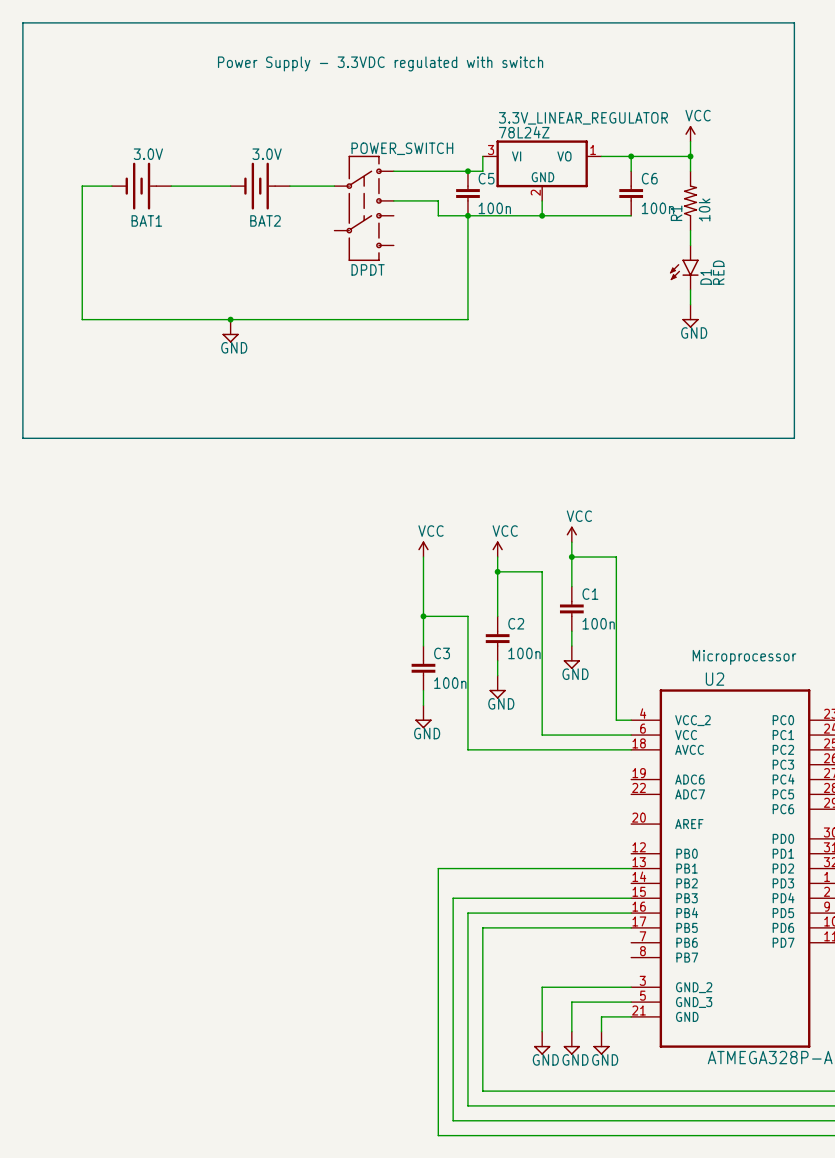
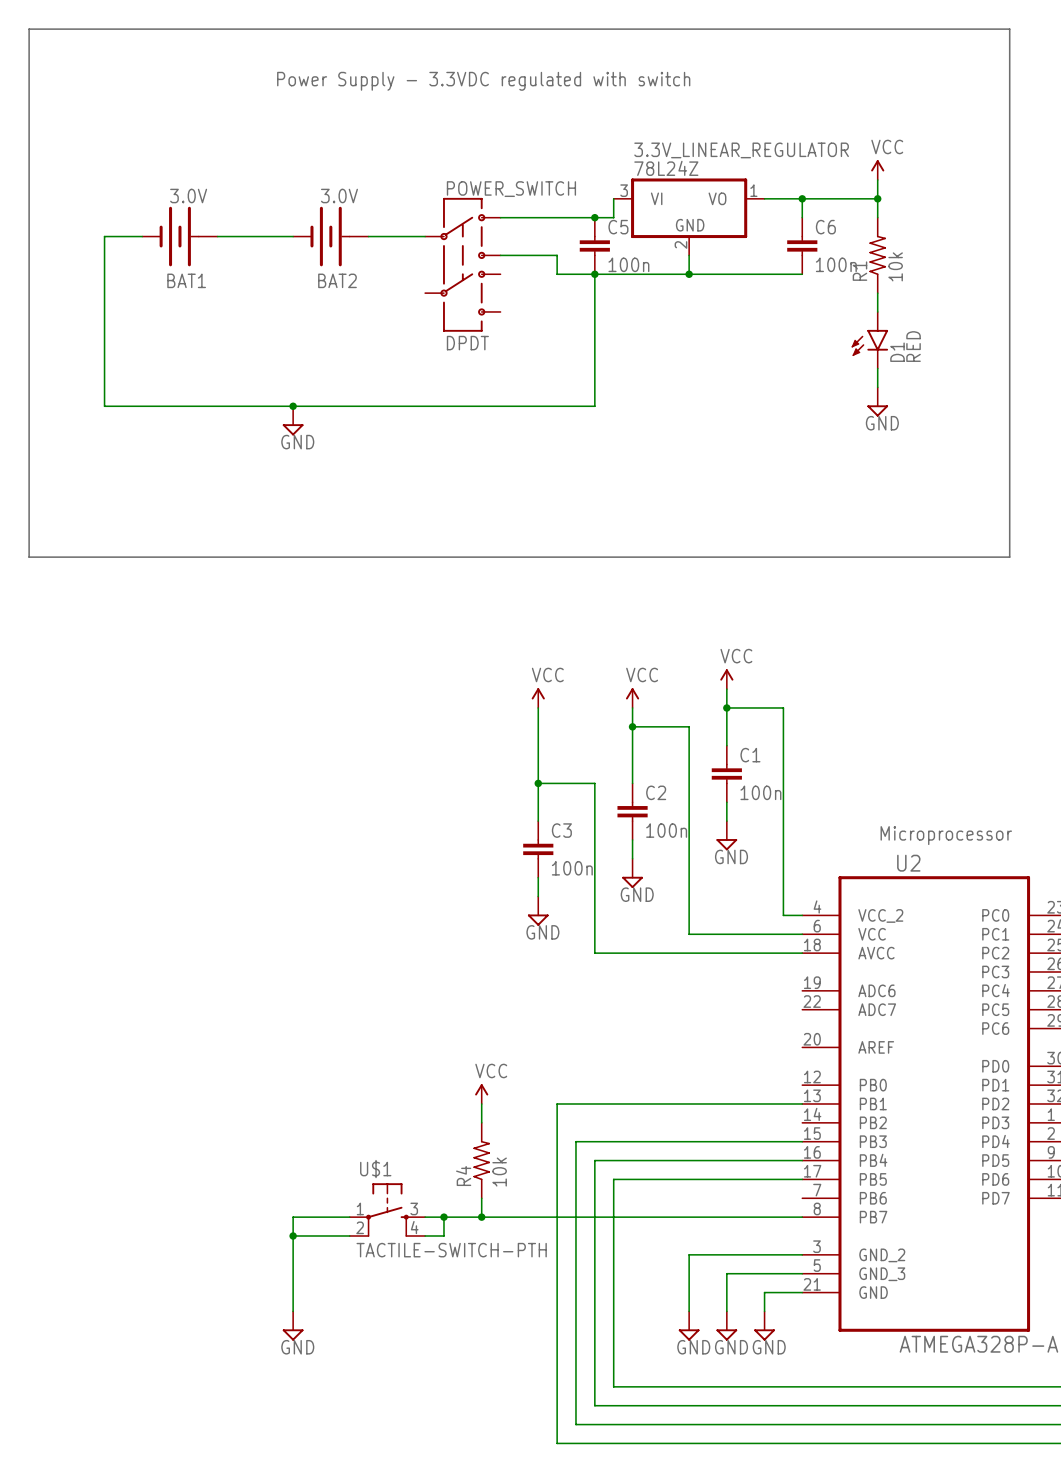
power symbol: none -> VCC (481, 1094)
wire: none -> (481, 1103) (481, 1122)
R4: none -> 10k (481, 1160)
wire: none -> (481, 1198) (481, 1217)
U$1: none -> TACTILE-SWITCH-PTH (387, 1209)
wire: none -> (349, 1217) (293, 1217) (293, 1311)
wire: none -> (425, 1217) (802, 1217)
wire: none -> (443, 1217) (443, 1236) (425, 1236)
junction: none -> (443, 1217)
junction: none -> (481, 1217)
wire: none -> (293, 1236) (349, 1236)
junction: none -> (293, 1236)
power symbol: none -> GND (293, 1326)

